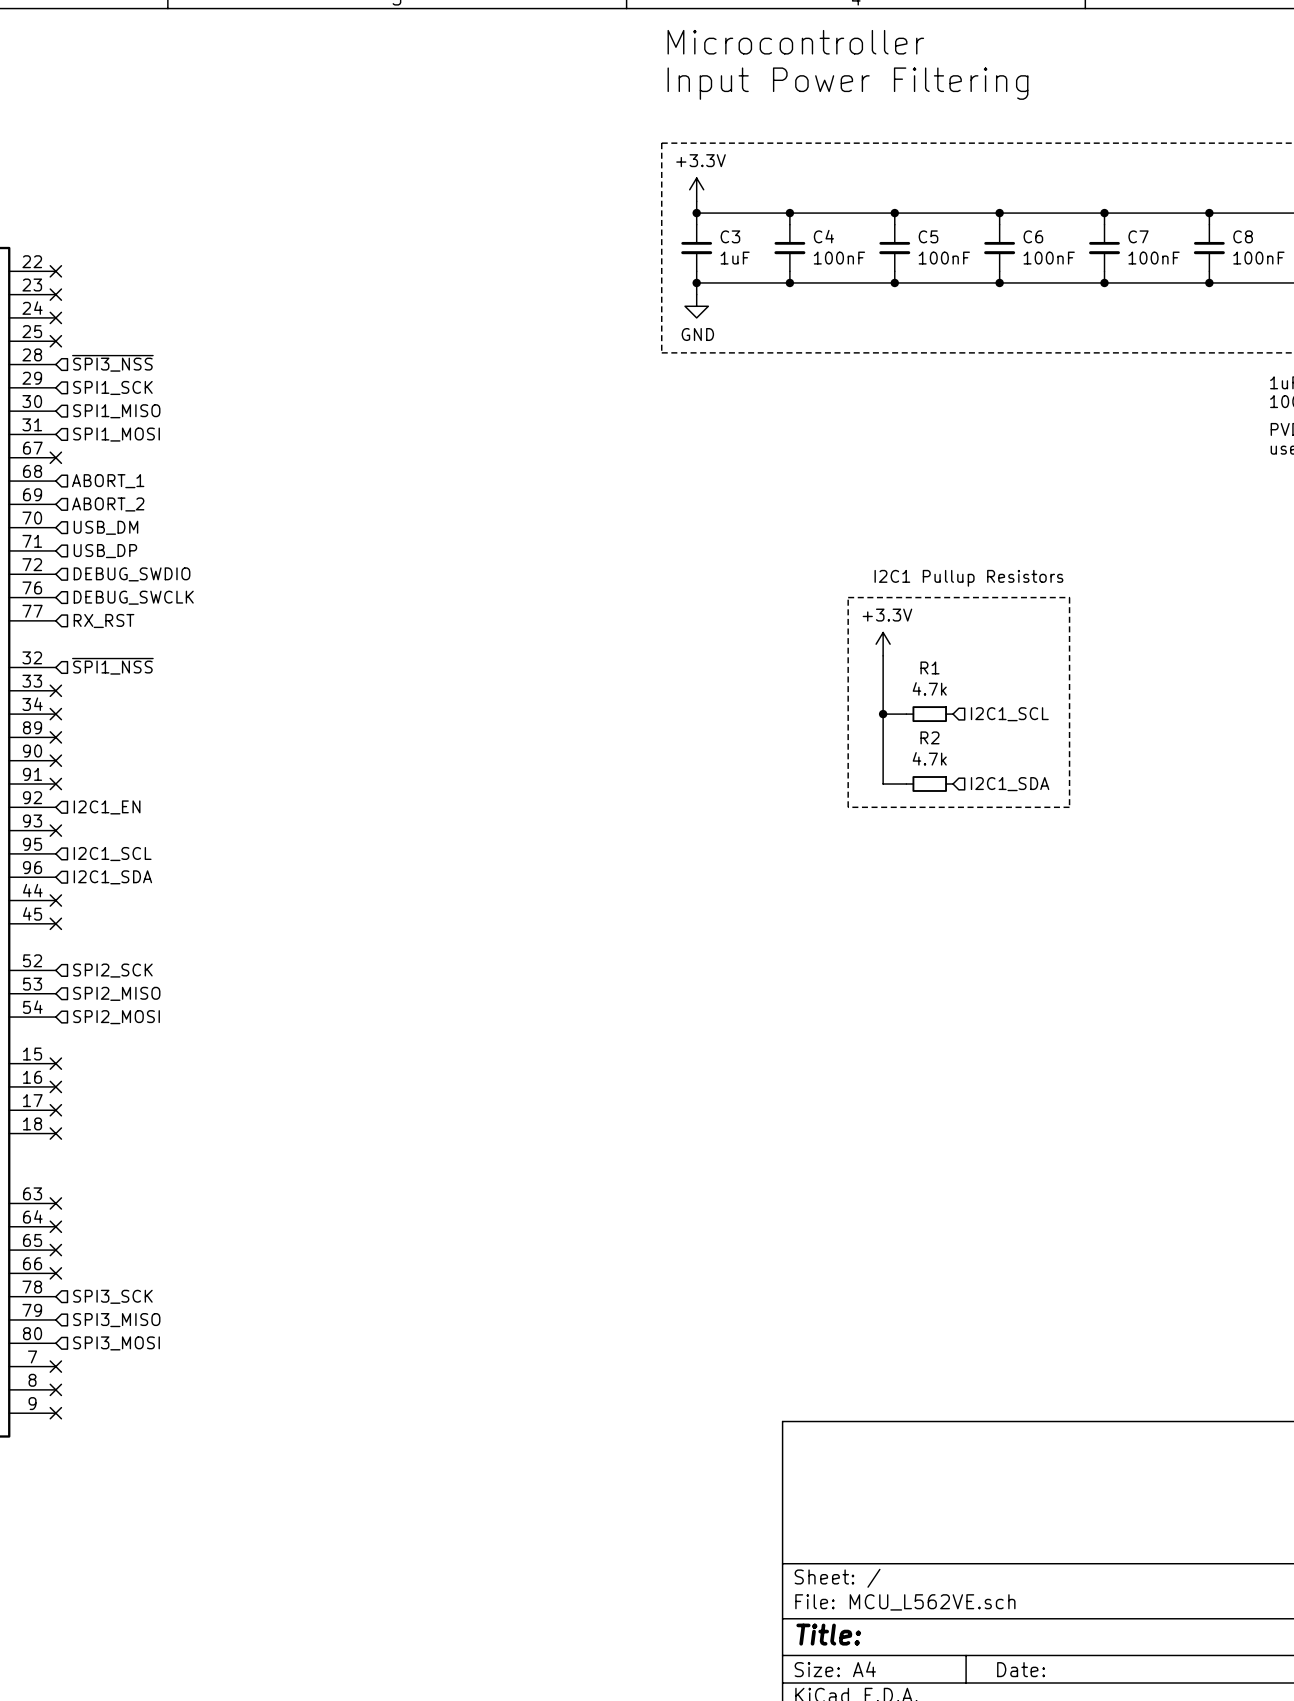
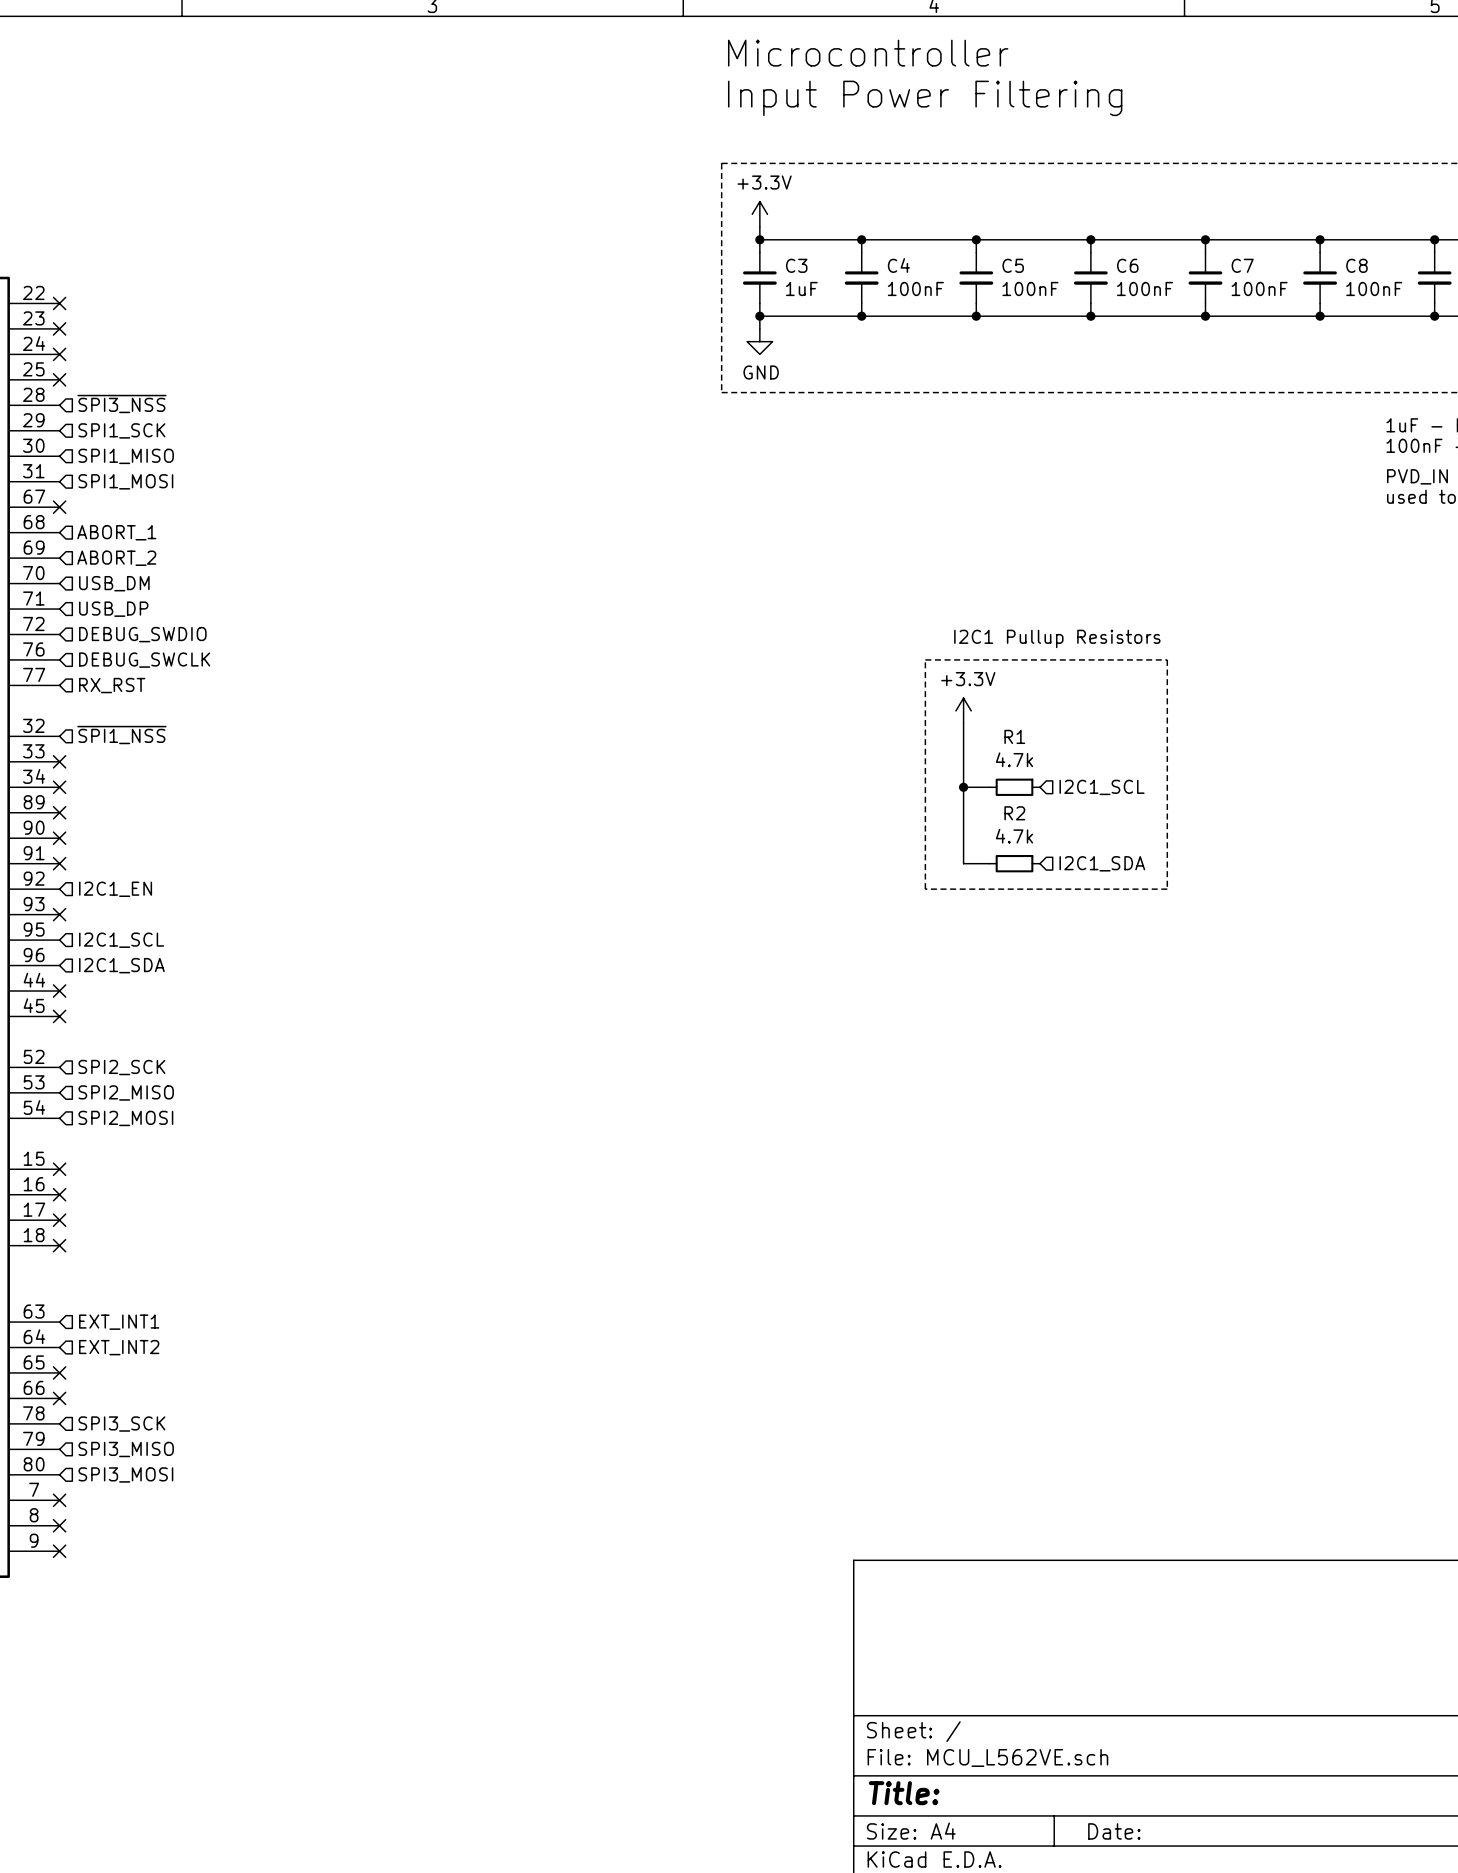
no-connect mark: (55, 1203) -> none
hierarchical label: none -> EXT_INT1 (119, 1322)
no-connect mark: (55, 1226) -> none
hierarchical label: none -> EXT_INT2 (119, 1347)

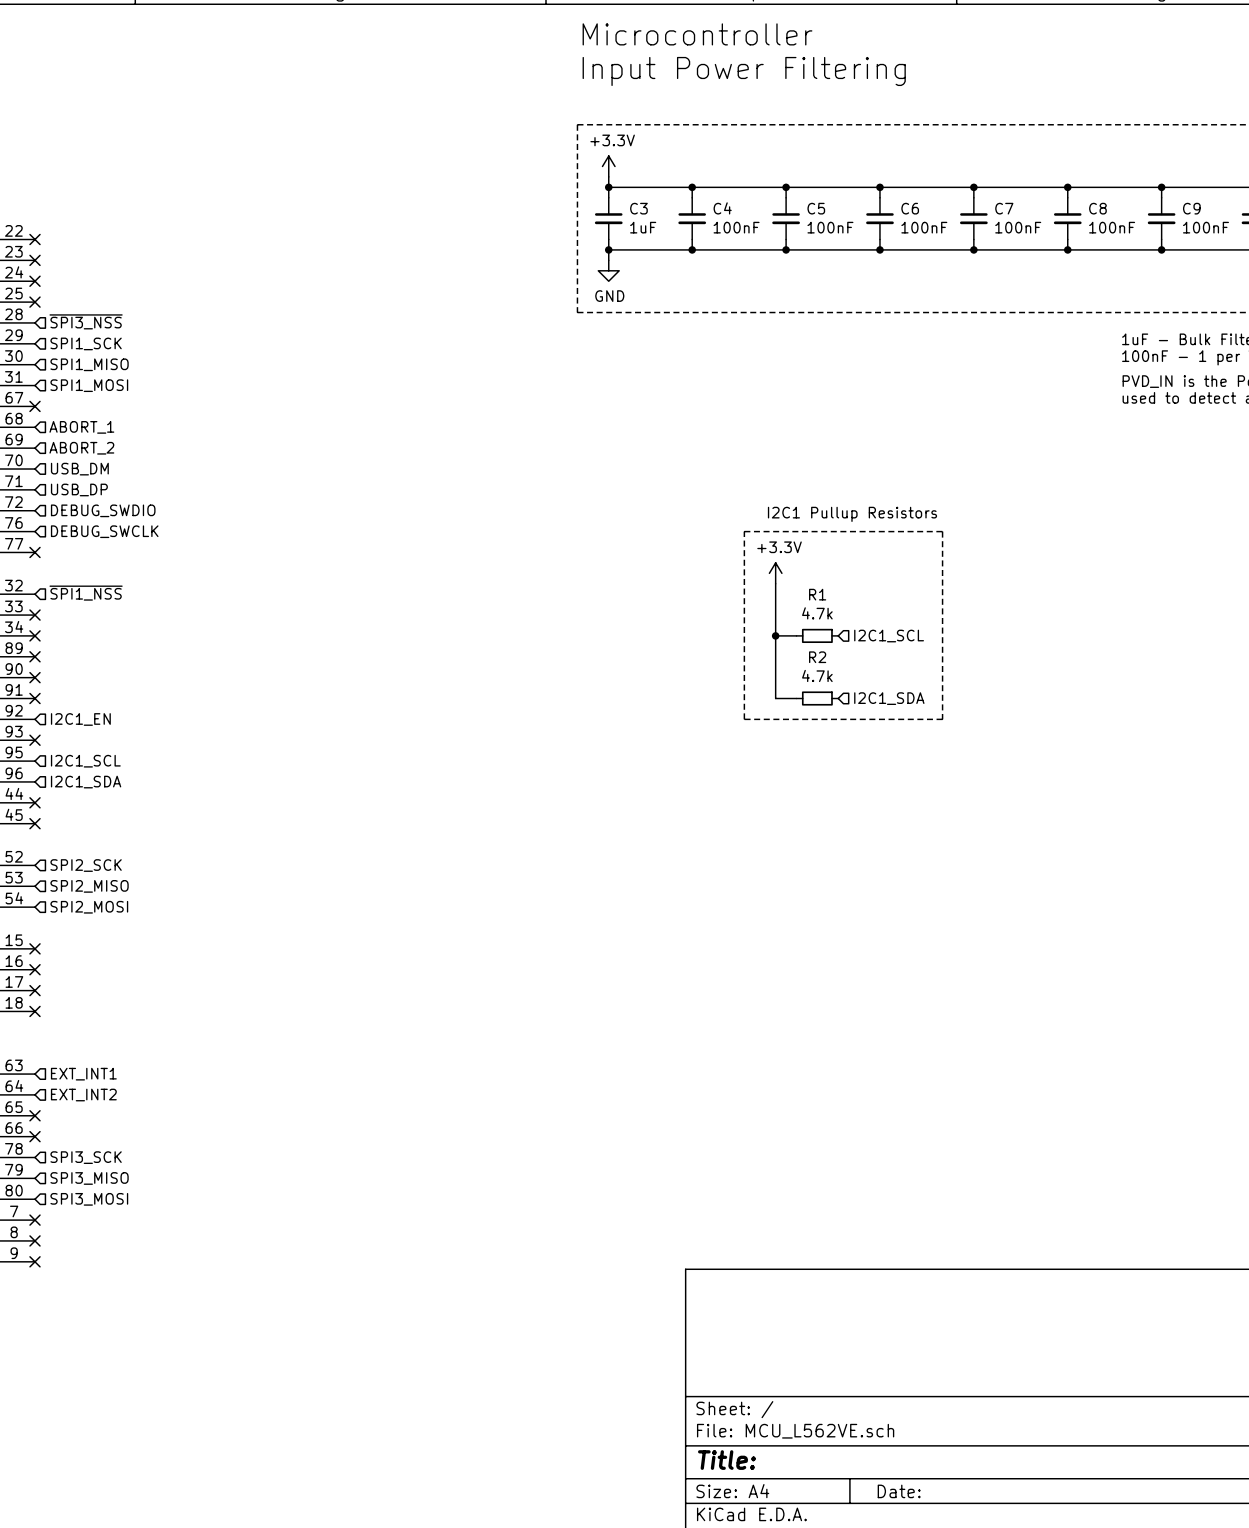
no-connect mark: none -> (35, 552)
hierarchical label: RX_RST (112, 685) -> none

